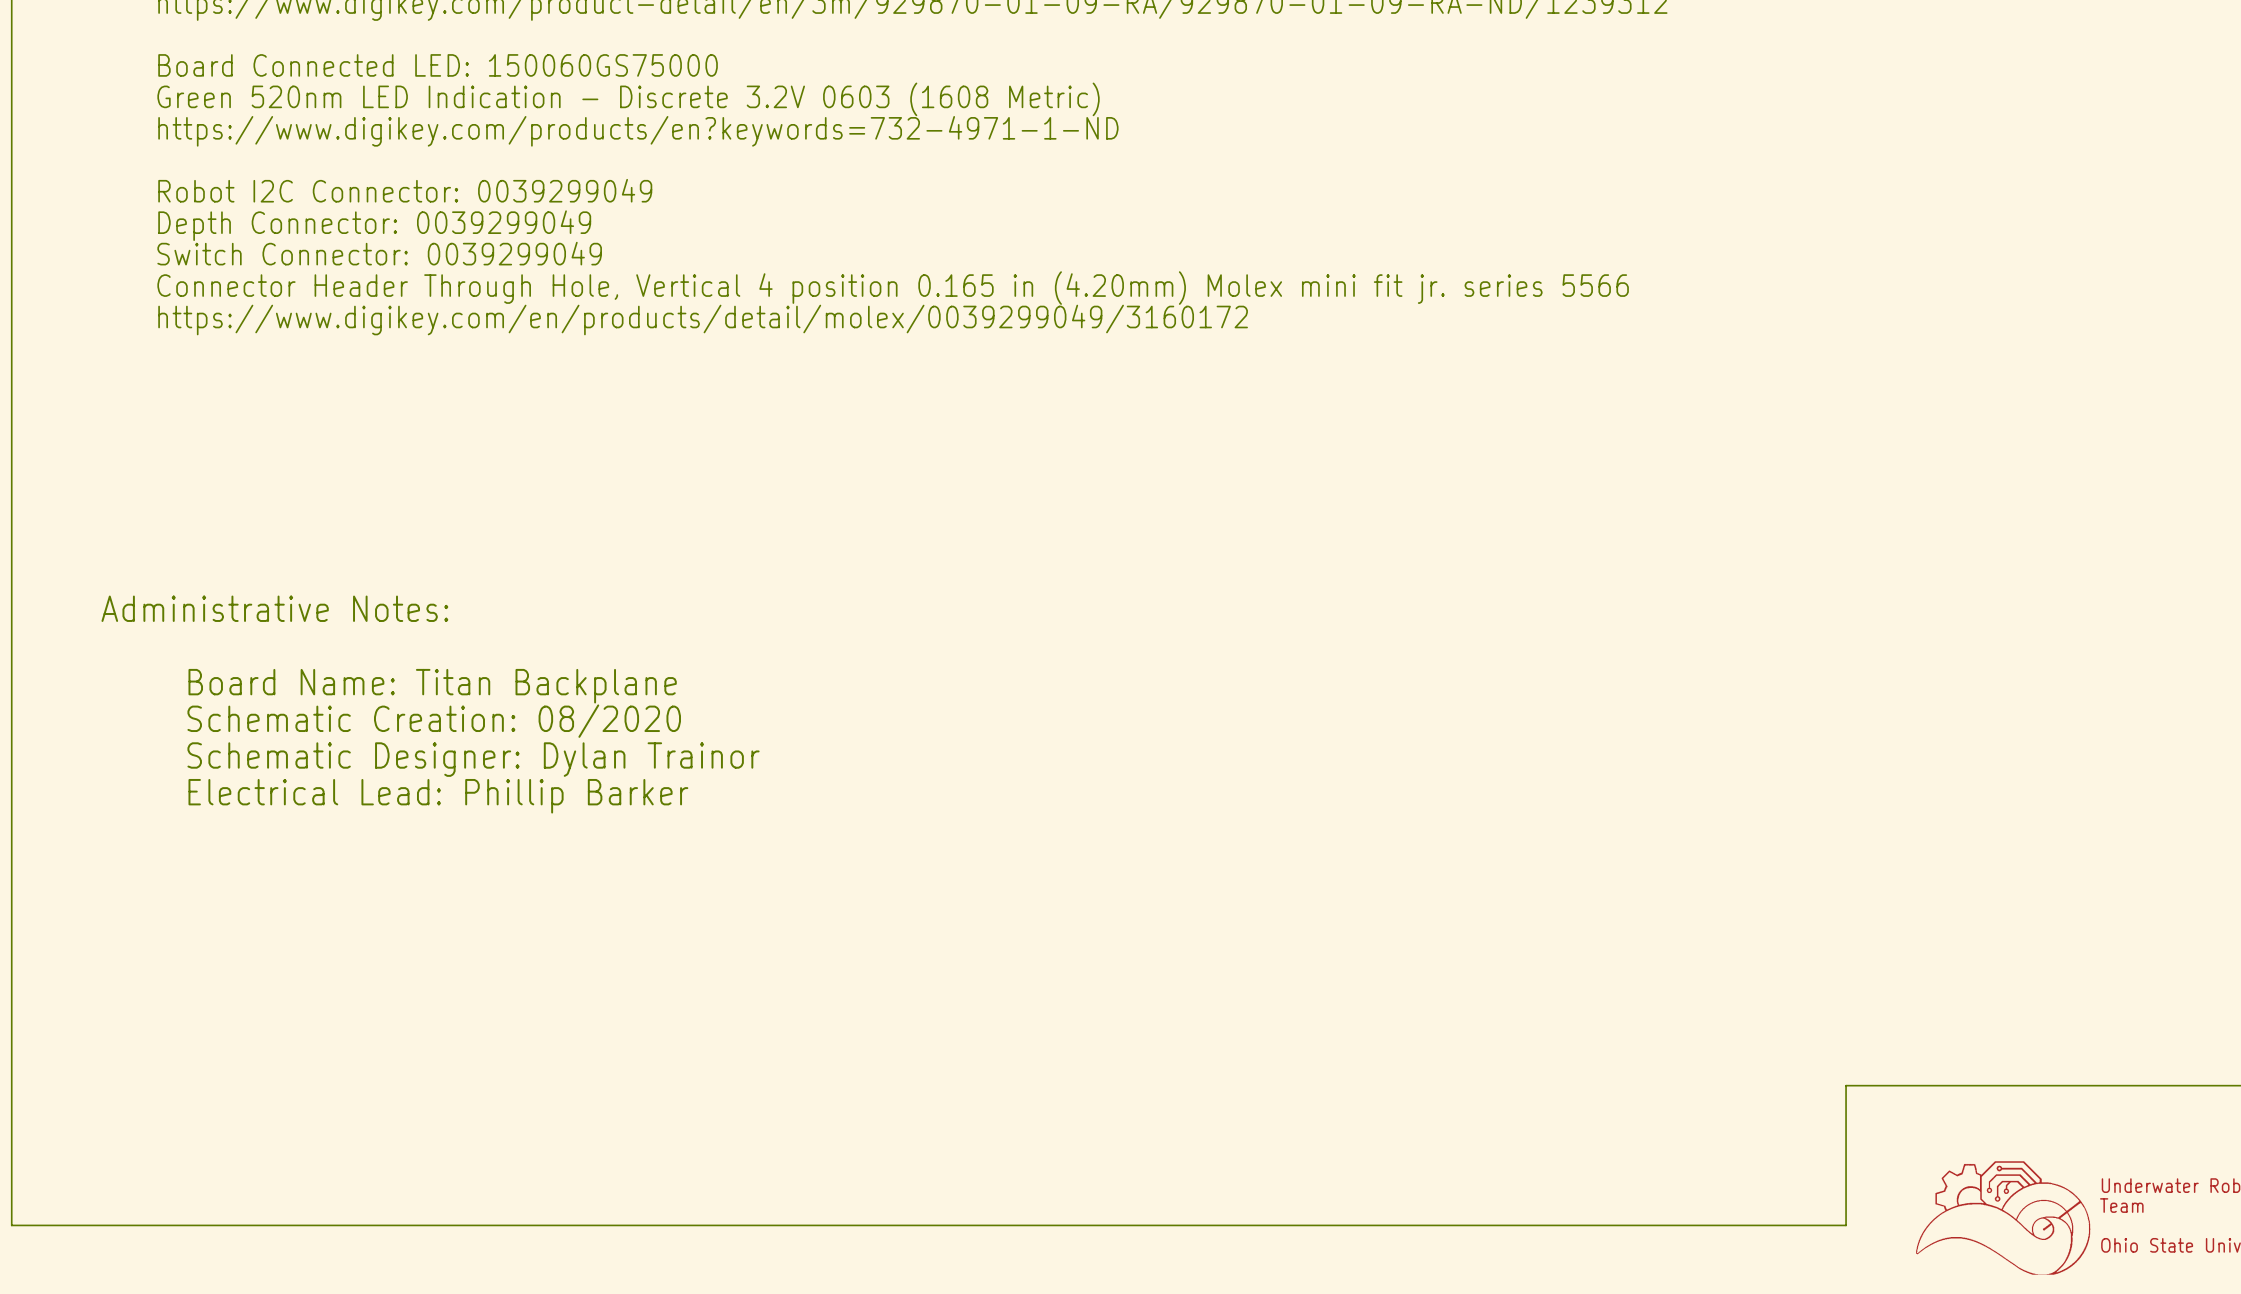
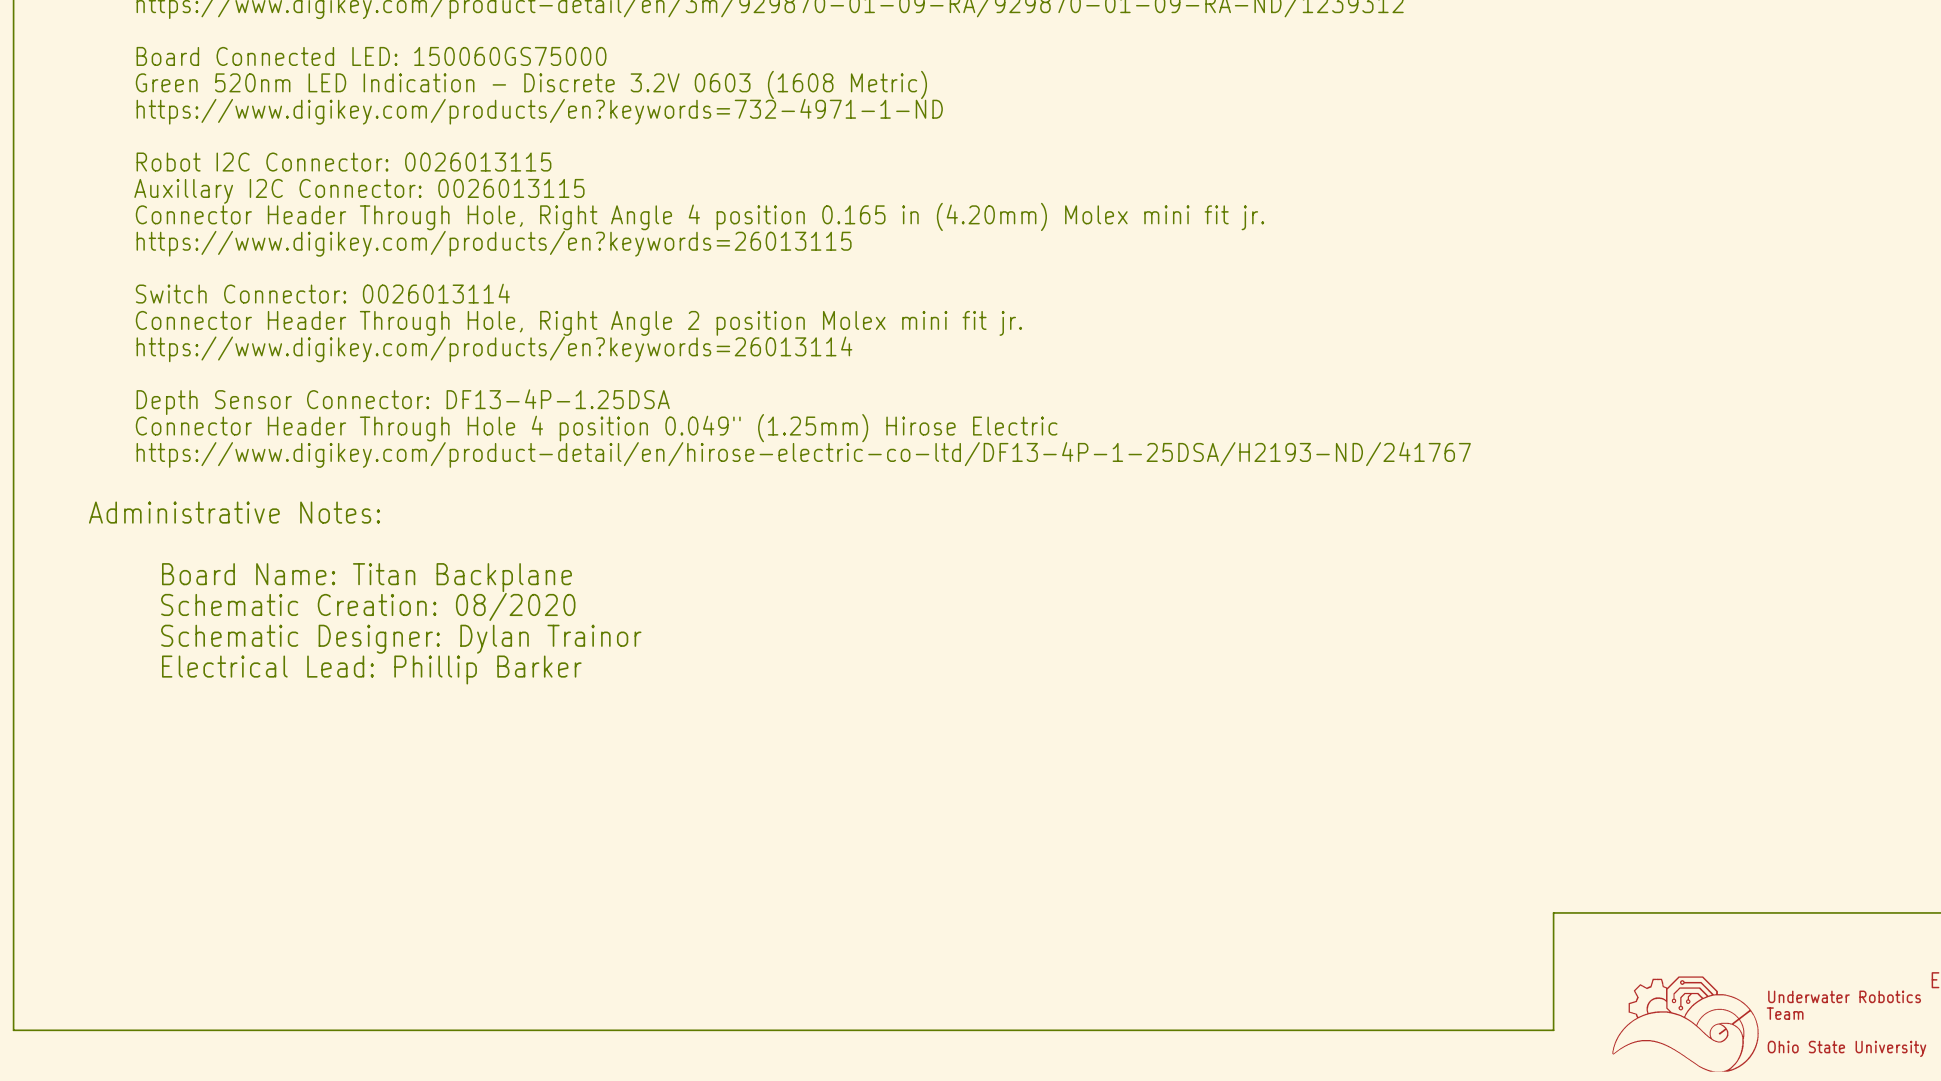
text: Robot I2C Connector: 0039299049 (405, 190) -> Robot I2C Connector: 0026013115 (343, 162)
text: Depth Connector: 0039299049 (374, 225) -> Auxillary I2C Connector: 0026013115 (359, 191)
text: Switch Connector: 0039299049 (379, 253) -> Connector Header Through Hole, Right Angle 4 position 0.165 in (4.20mm) Molex mini fit jr. (699, 216)
text: Connector Header Through Hole, Vertical 4 position 0.165 in (4.20mm) Molex mini fit jr. series 5566 (893, 288) -> https://www.digikey.com/products/en?keywords=26013115 (494, 243)
text: https://www.digikey.com/en/products/detail/molex/0039299049/3160172 (703, 320) -> none
text: none -> Switch Connector: 0026013114 (322, 293)
text: none -> Connector Header Through Hole, Right Angle 2 position Molex mini fit jr. (578, 323)
text: none -> https://www.digikey.com/products/en?keywords=26013114 (494, 349)
text: none -> Depth Sensor Connector: DF13-4P-1.25DSA (403, 402)
text: none -> Connector Header Through Hole 4 position 0.049" (1.25mm) Hirose Electric (596, 428)
text: none -> https://www.digikey.com/product-detail/en/hirose-electric-co-ltd/DF13-4P-1-25DSA/H2193-ND/241767 (803, 454)

